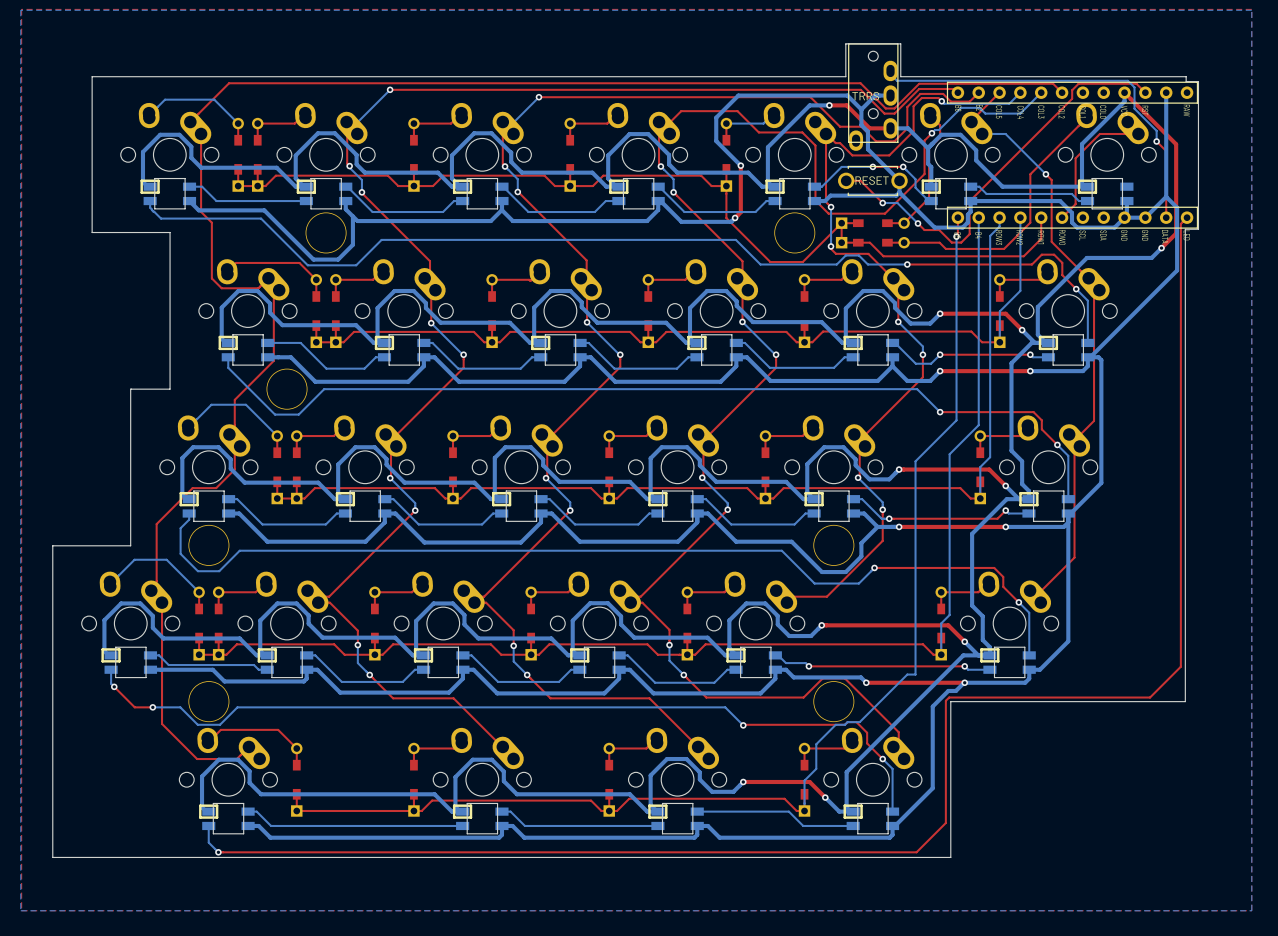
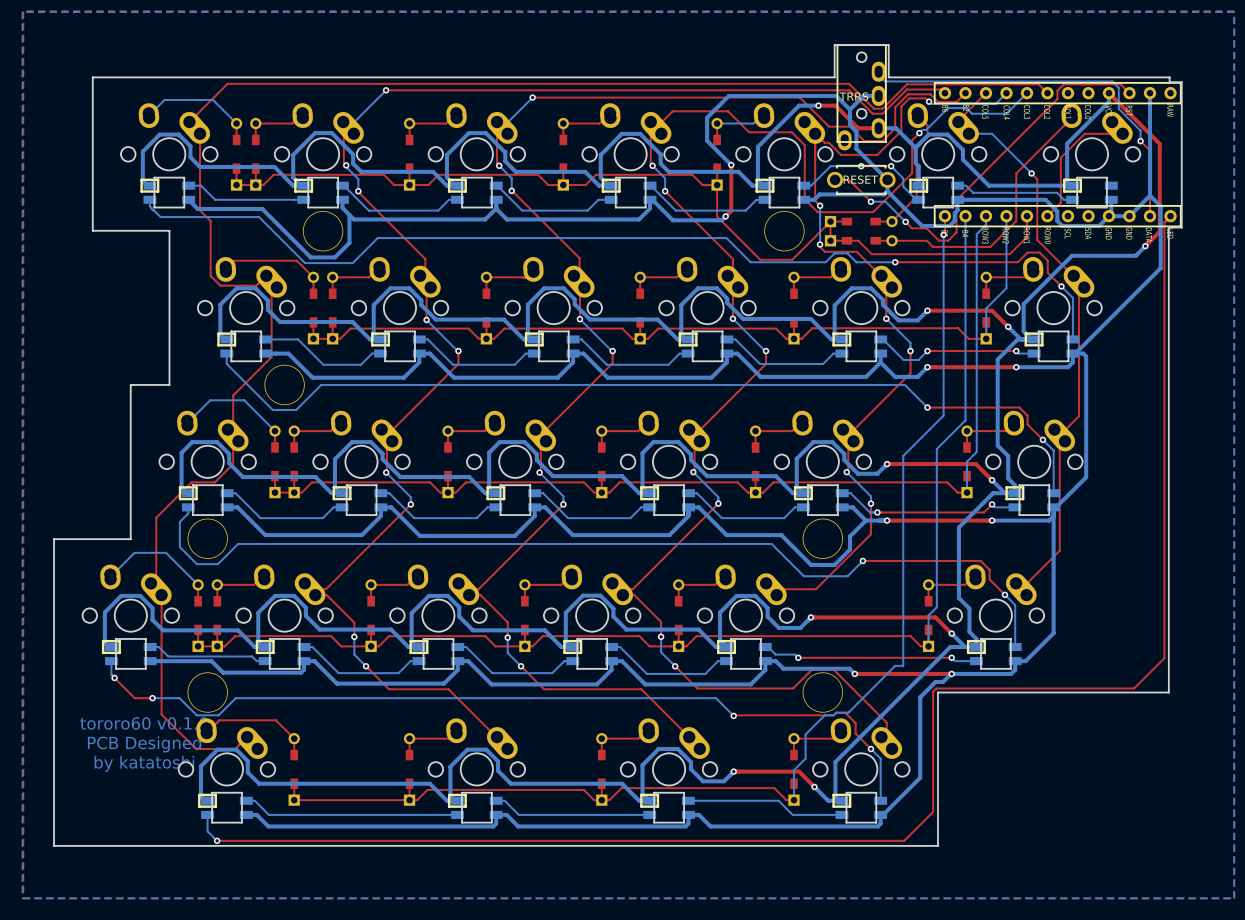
text: none -> tororo60 v0.1.0 (144, 723)
text: none -> PCB Designed (144, 744)
text: none -> by katatoshi (144, 763)

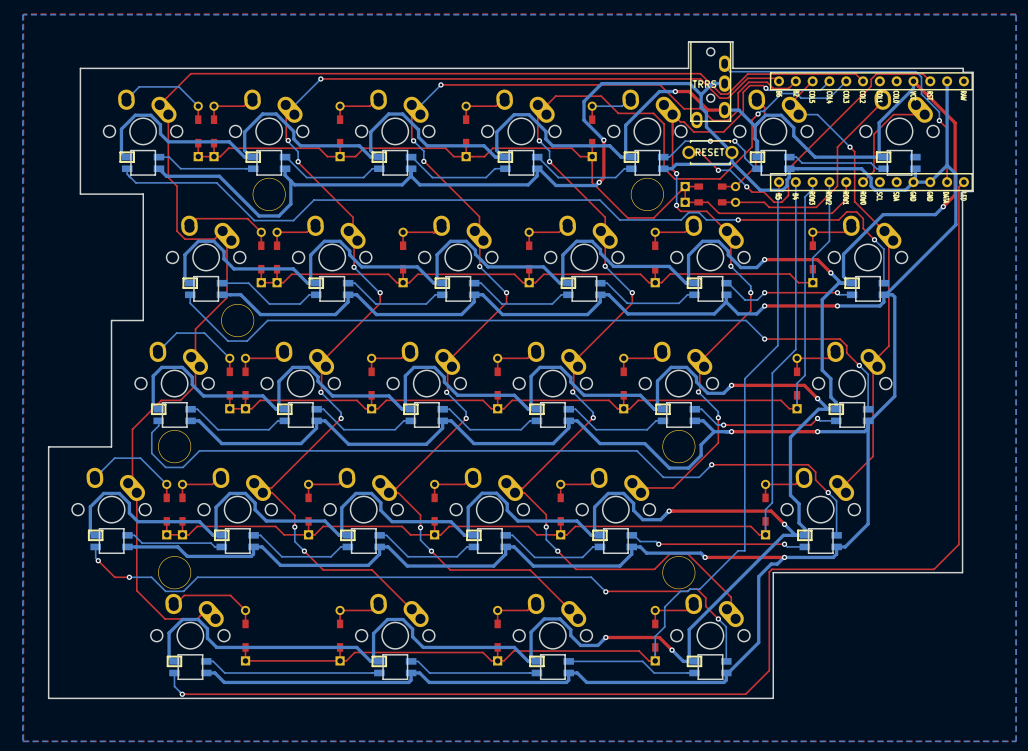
text: tororo60 v0.1.0 (144, 723) -> none
text: PCB Designed (144, 744) -> none
text: by katatoshi (144, 763) -> none

